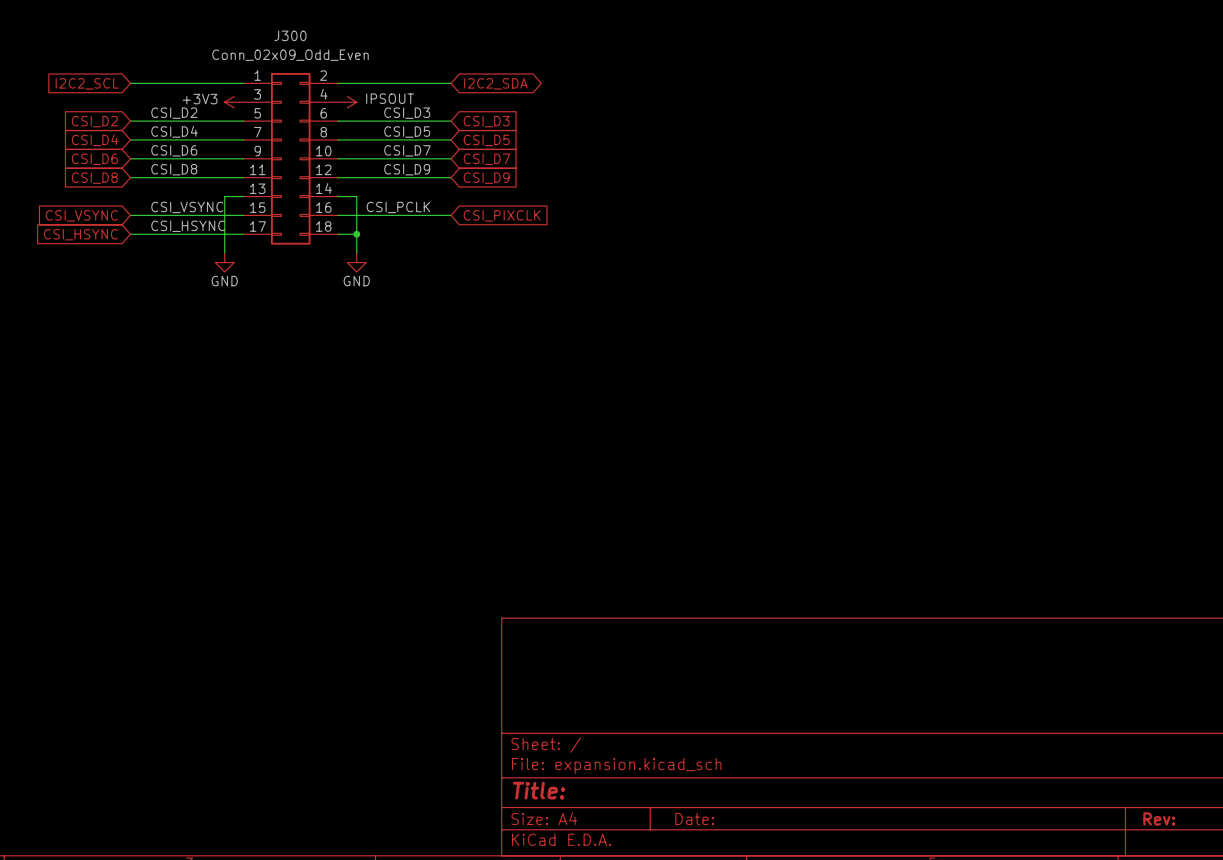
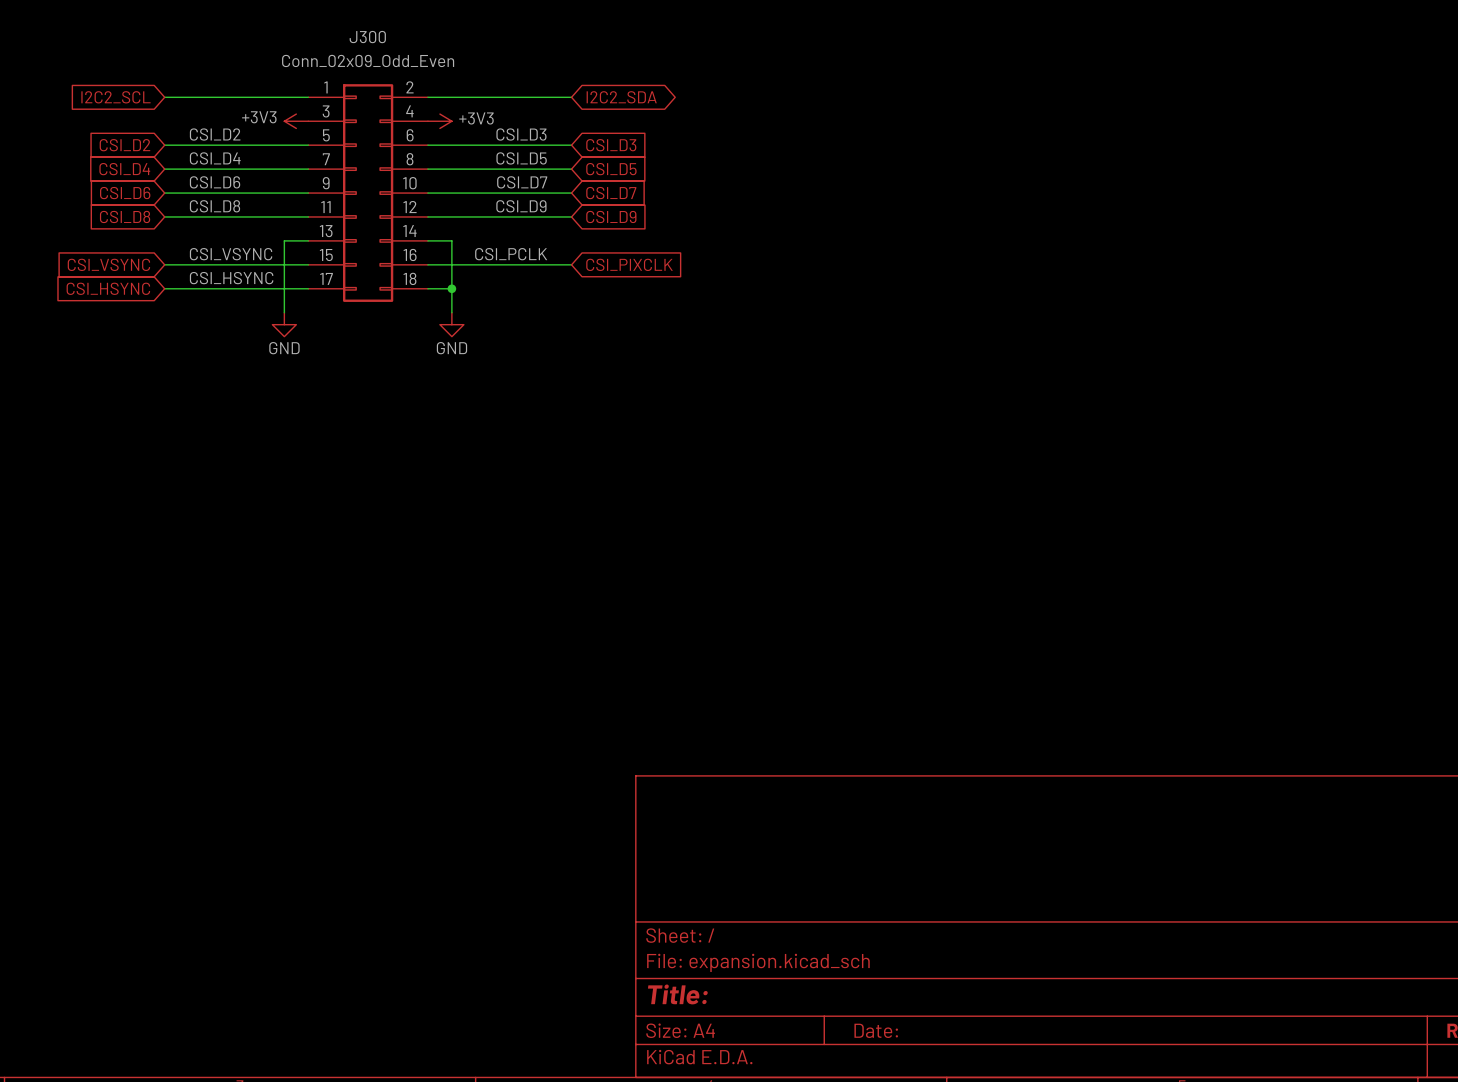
power symbol: IPSOUT (347, 102) -> +3V3 (439, 121)

